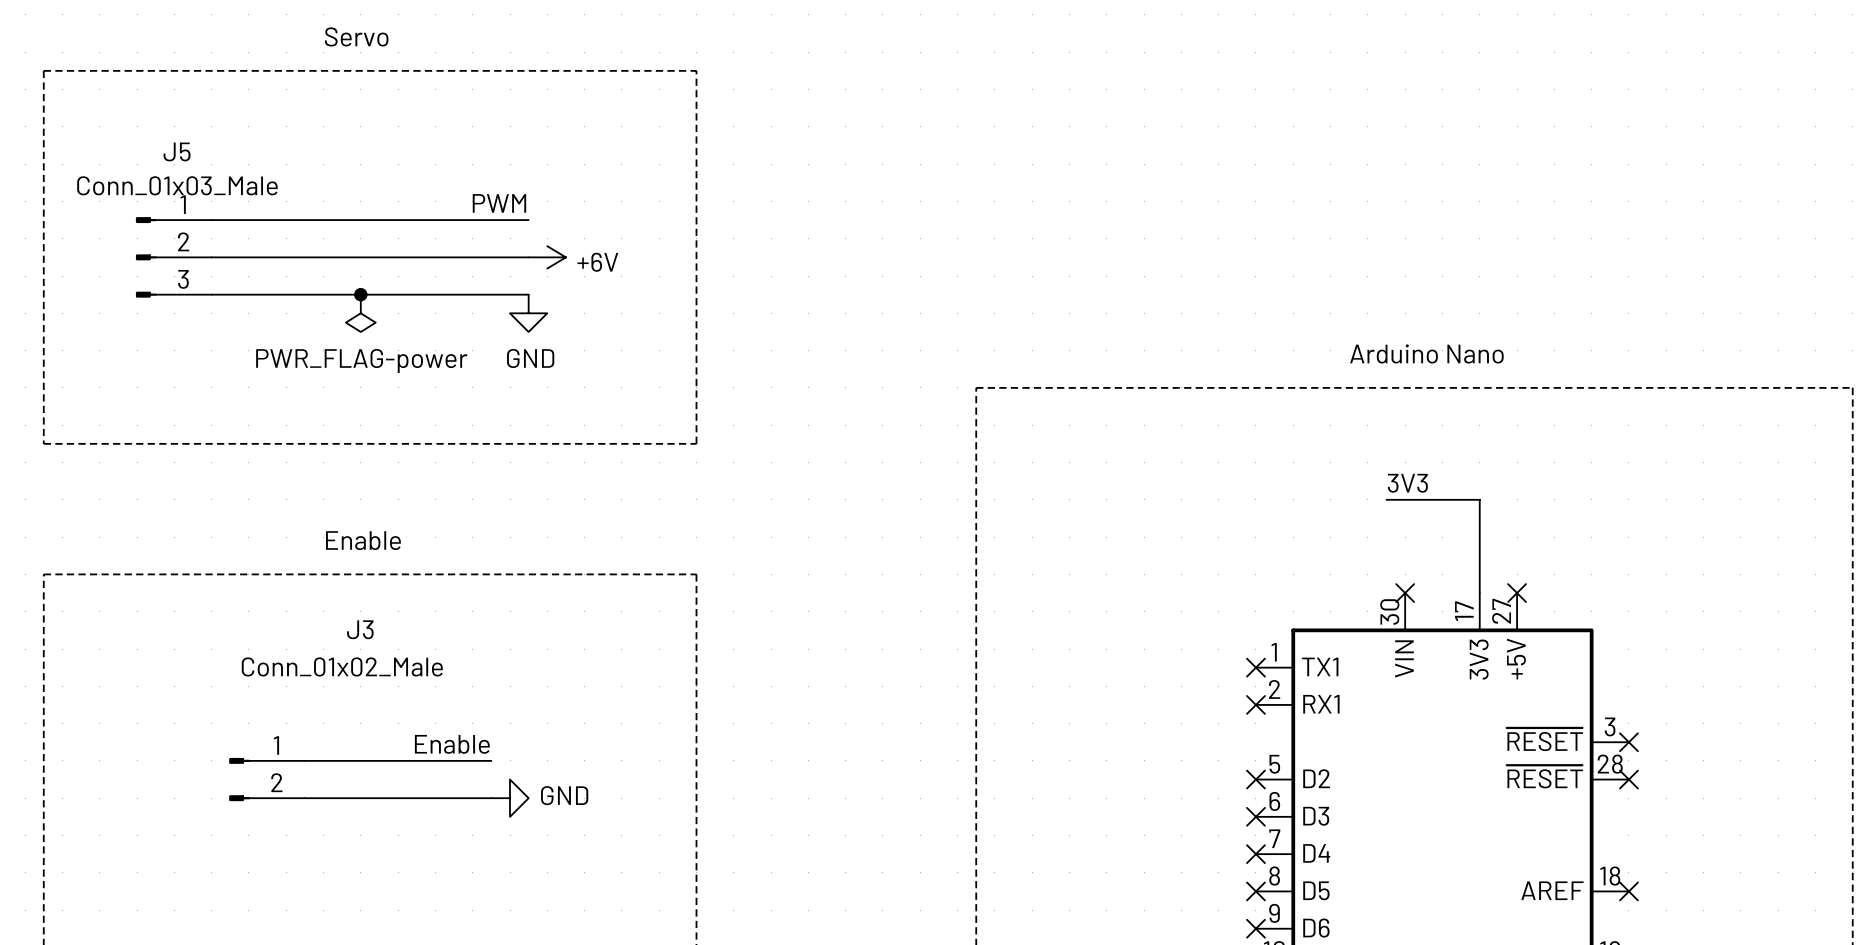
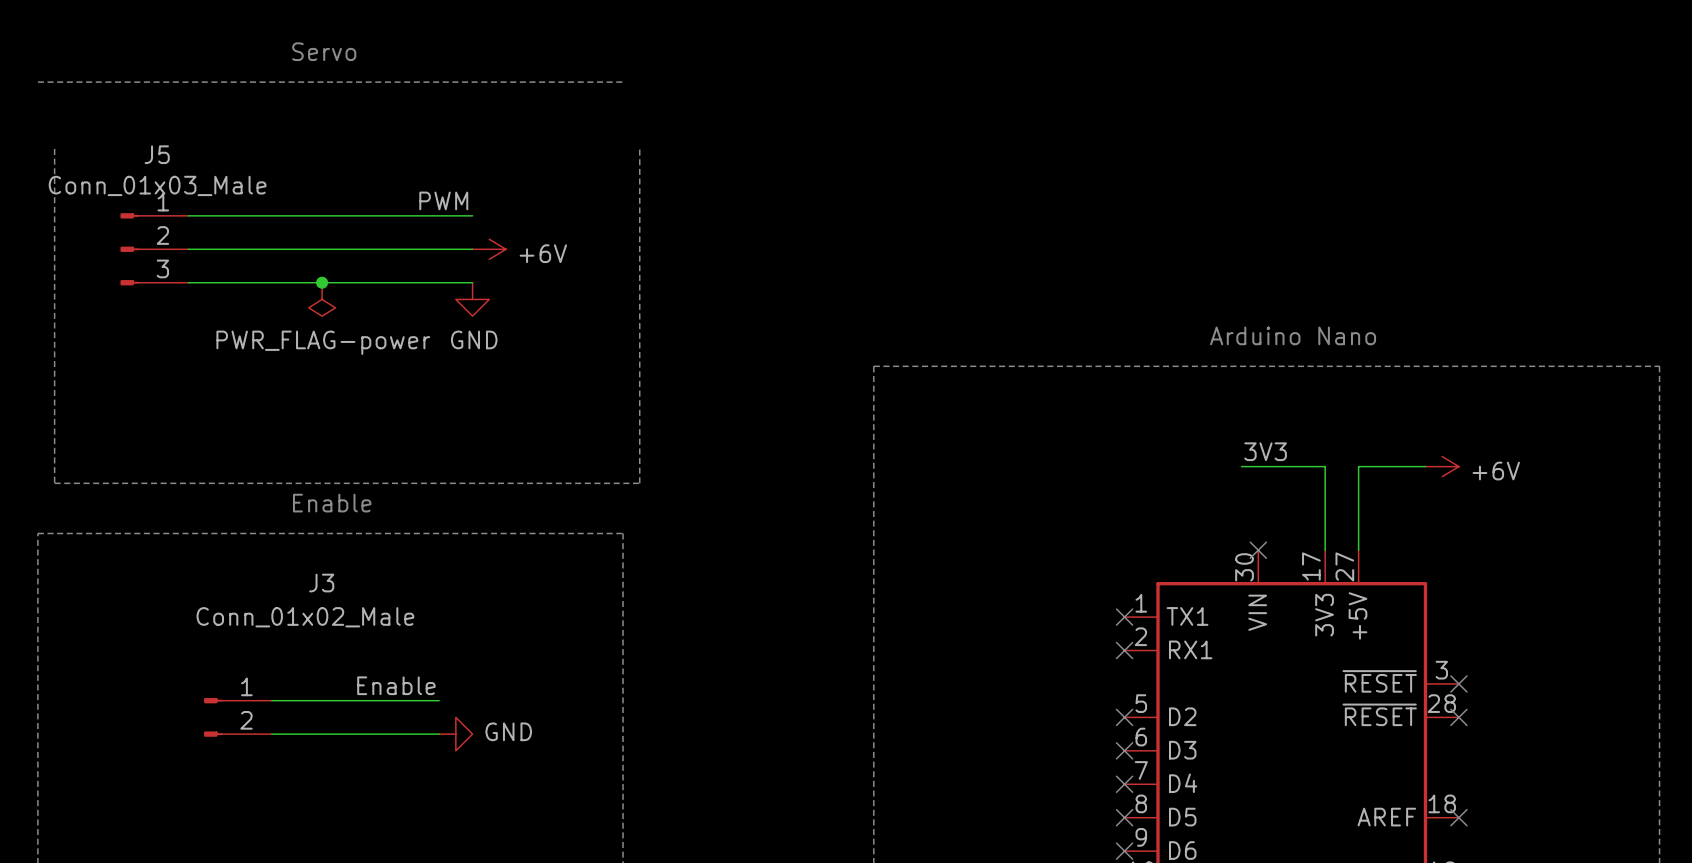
line: (43, 70) (43, 443) (696, 443) (696, 70) -> (54, 148) (54, 483) (639, 483) (639, 148)
wire: none -> (1425, 466) (1358, 466) (1358, 550)
power symbol: none -> +6V (1442, 466)
no-connect mark: (1517, 593) -> none

